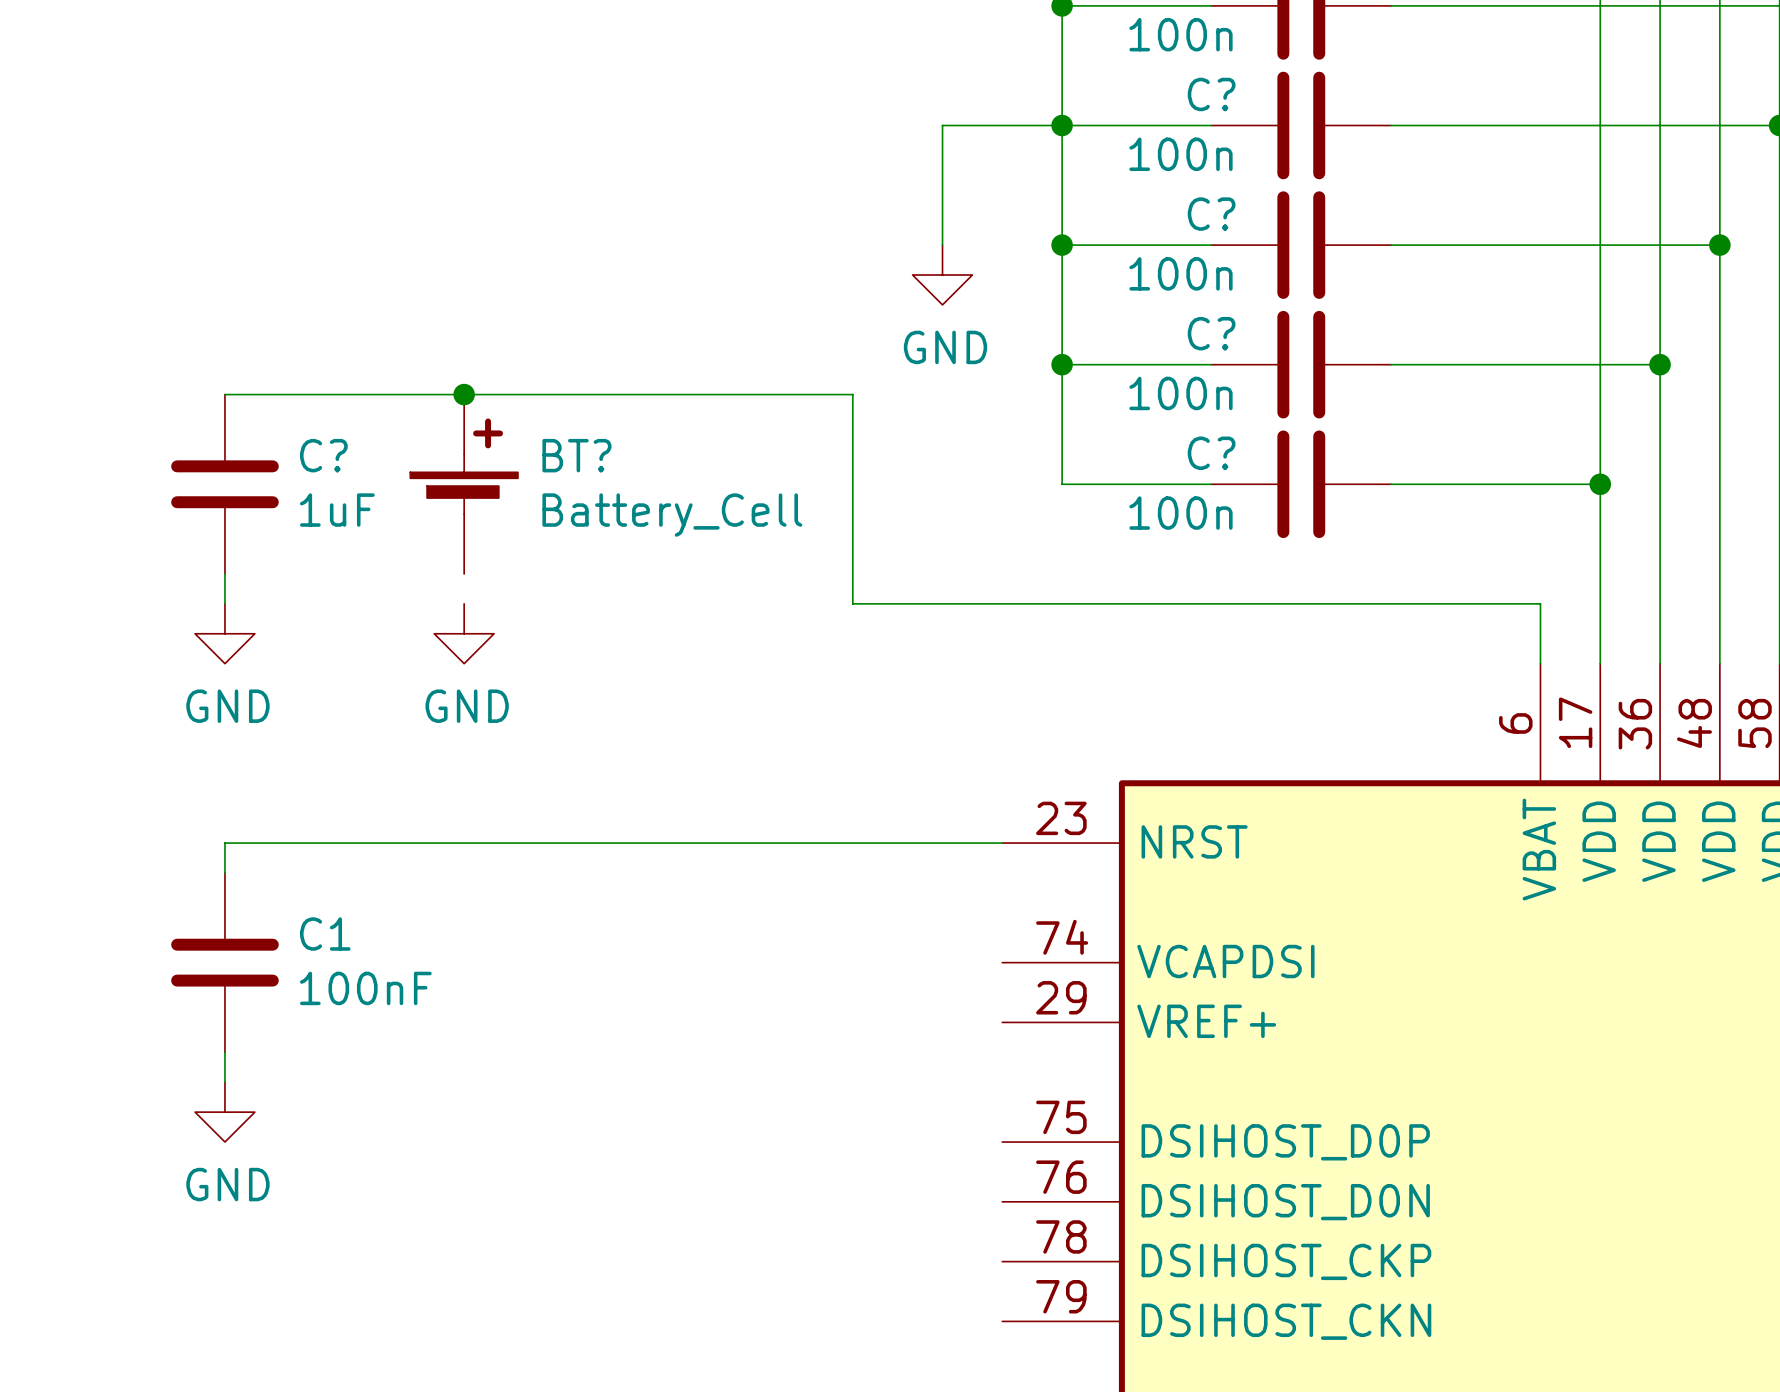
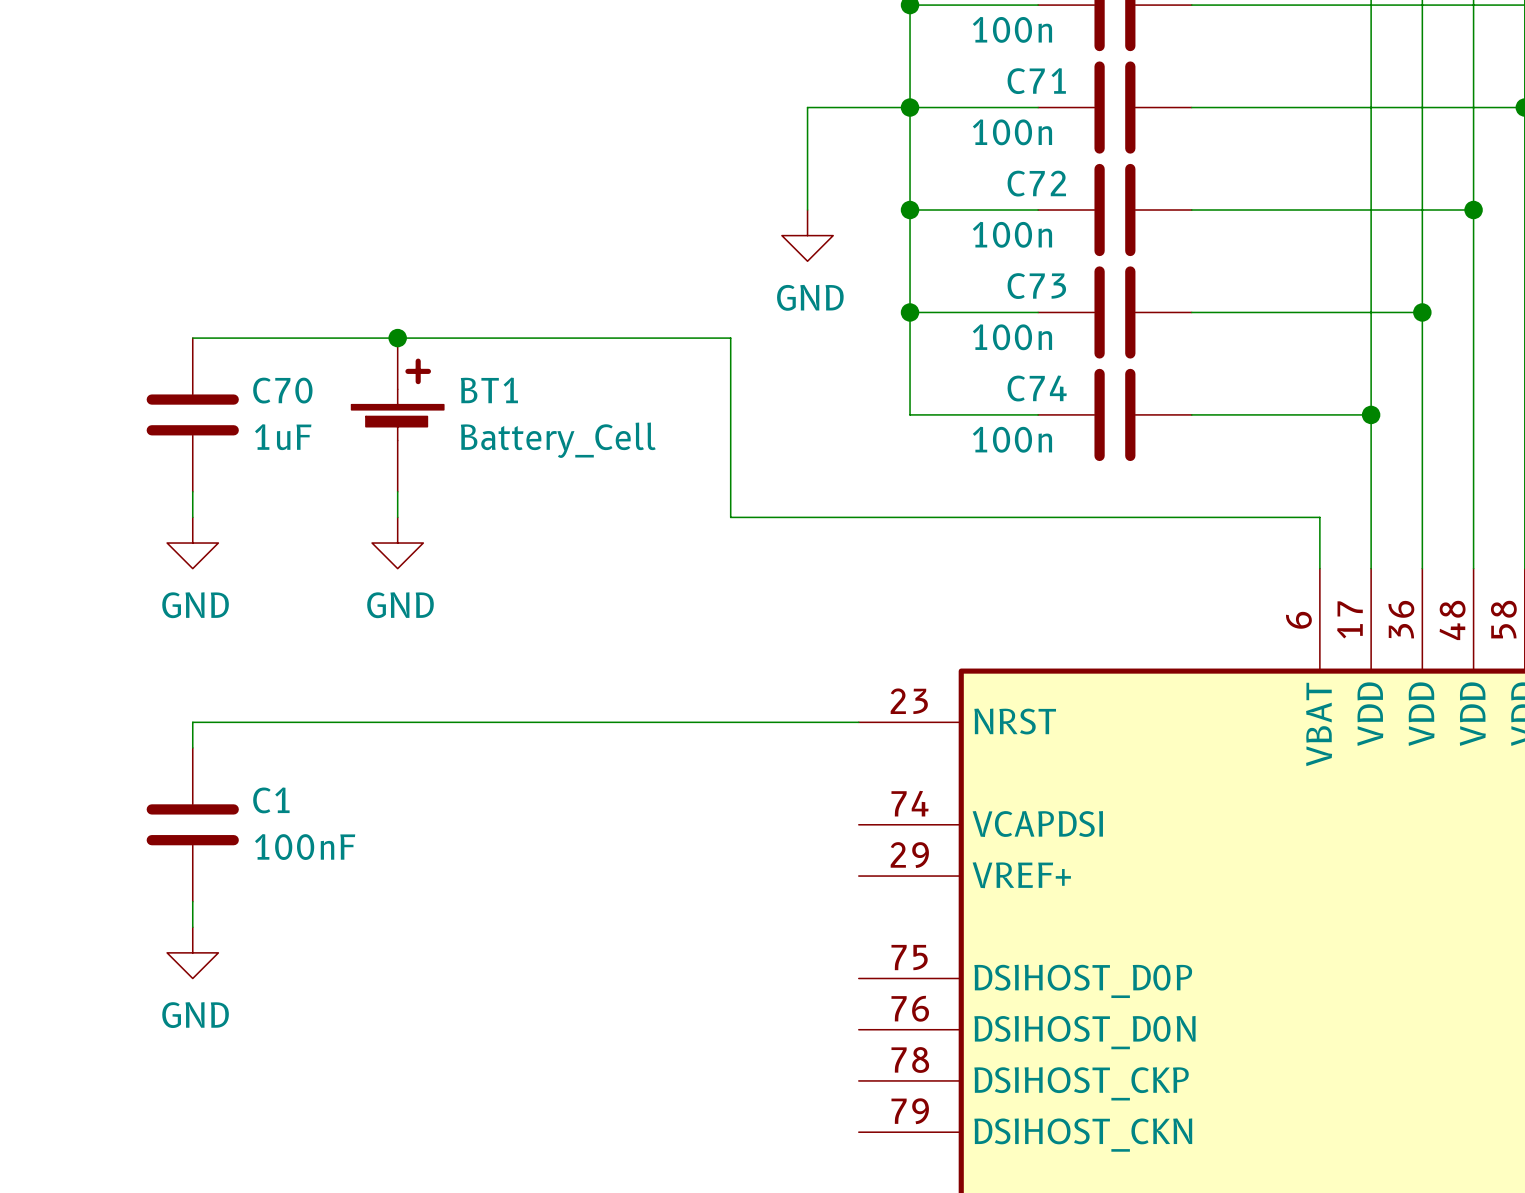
C? name: C? (1211, 94) -> C71 (1036, 81)
C? name: C? (1211, 214) -> C72 (1036, 183)
C? name: C? (1211, 333) -> C73 (1036, 286)
C? name: C? (1211, 453) -> C74 (1037, 388)
C? name: C? (323, 455) -> C70 (282, 390)
BT? name: BT? (576, 455) -> BT1 (489, 390)
wire: none -> (397, 491) (397, 517)

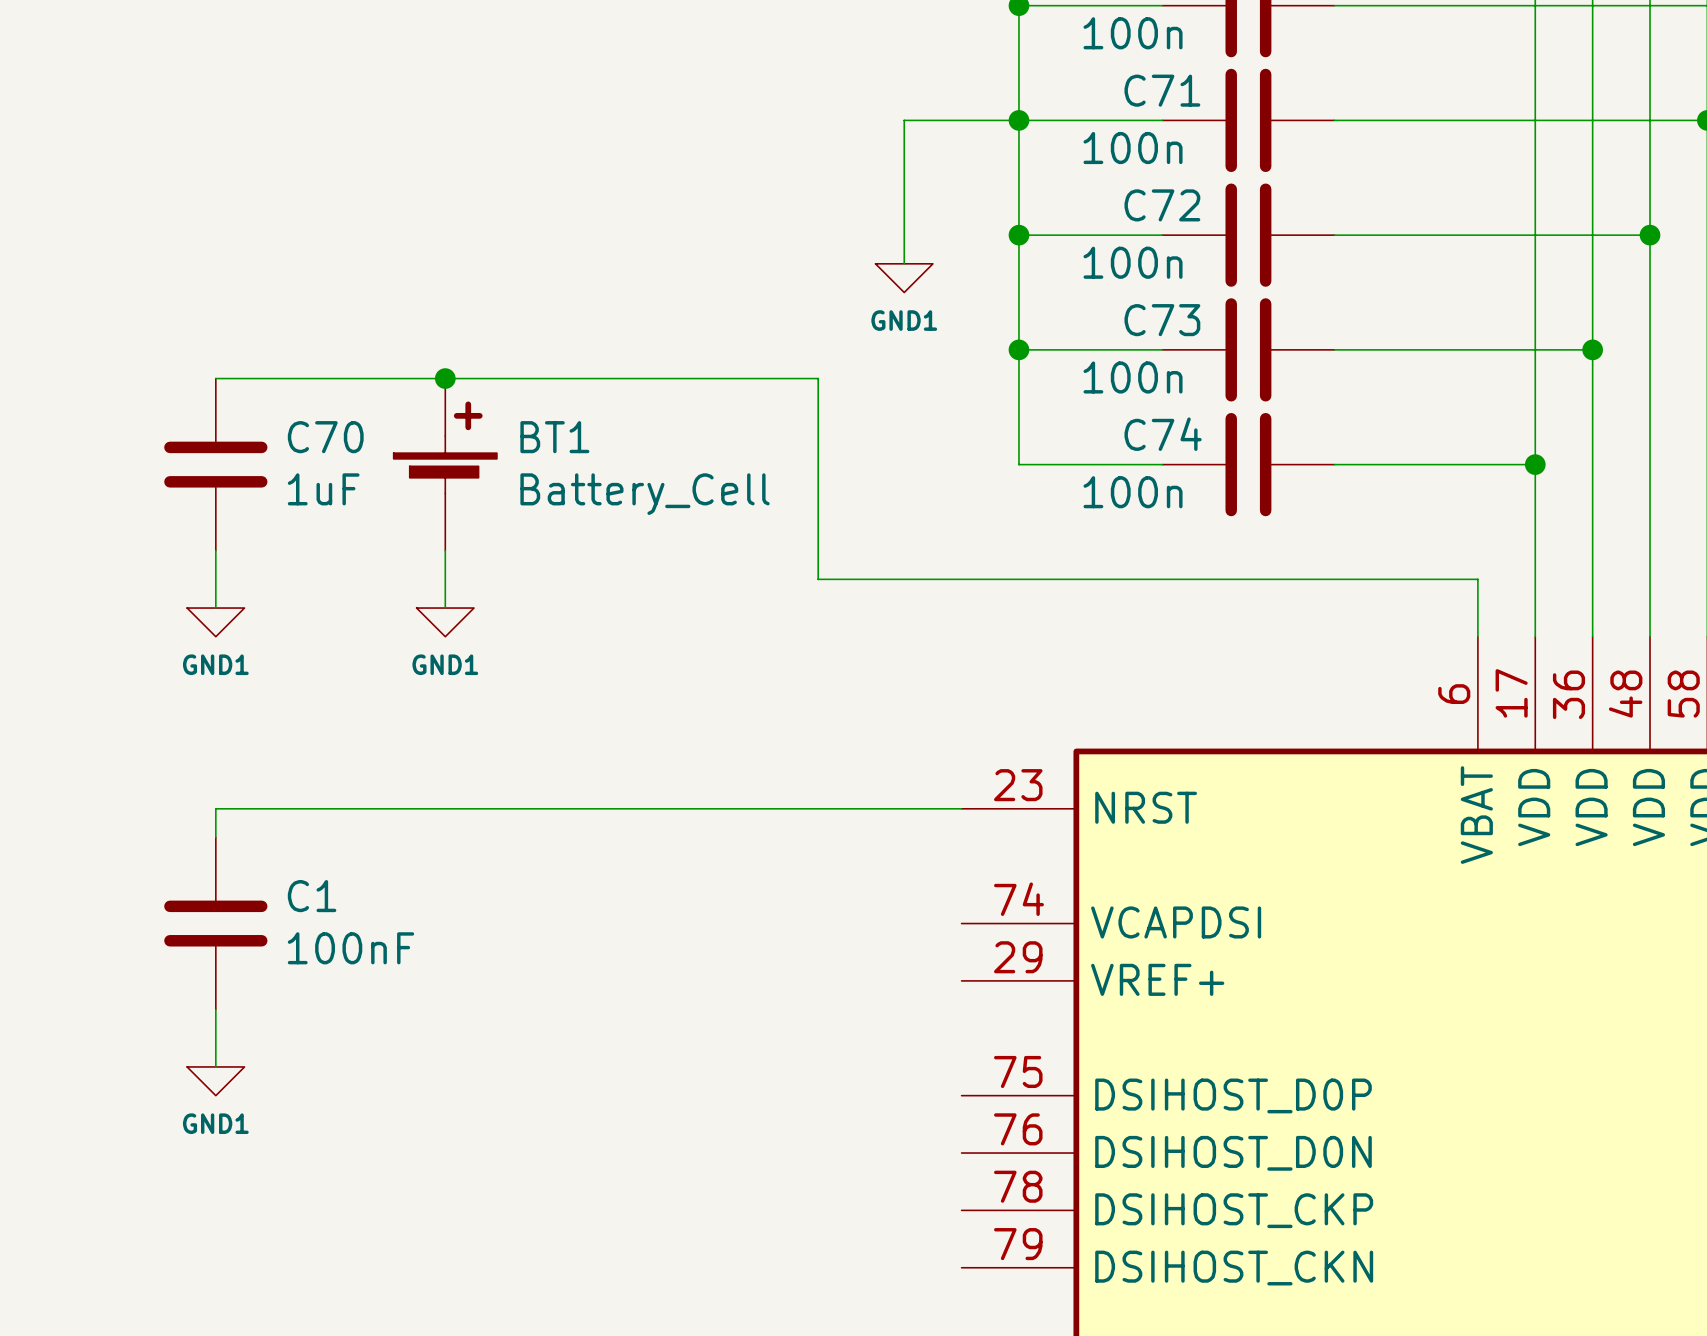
power symbol: GND (807, 235) -> GND1 (904, 278)
power symbol: GND (192, 543) -> GND1 (215, 622)
power symbol: GND (397, 543) -> GND1 (445, 622)
power symbol: GND (192, 952) -> GND1 (215, 1081)

